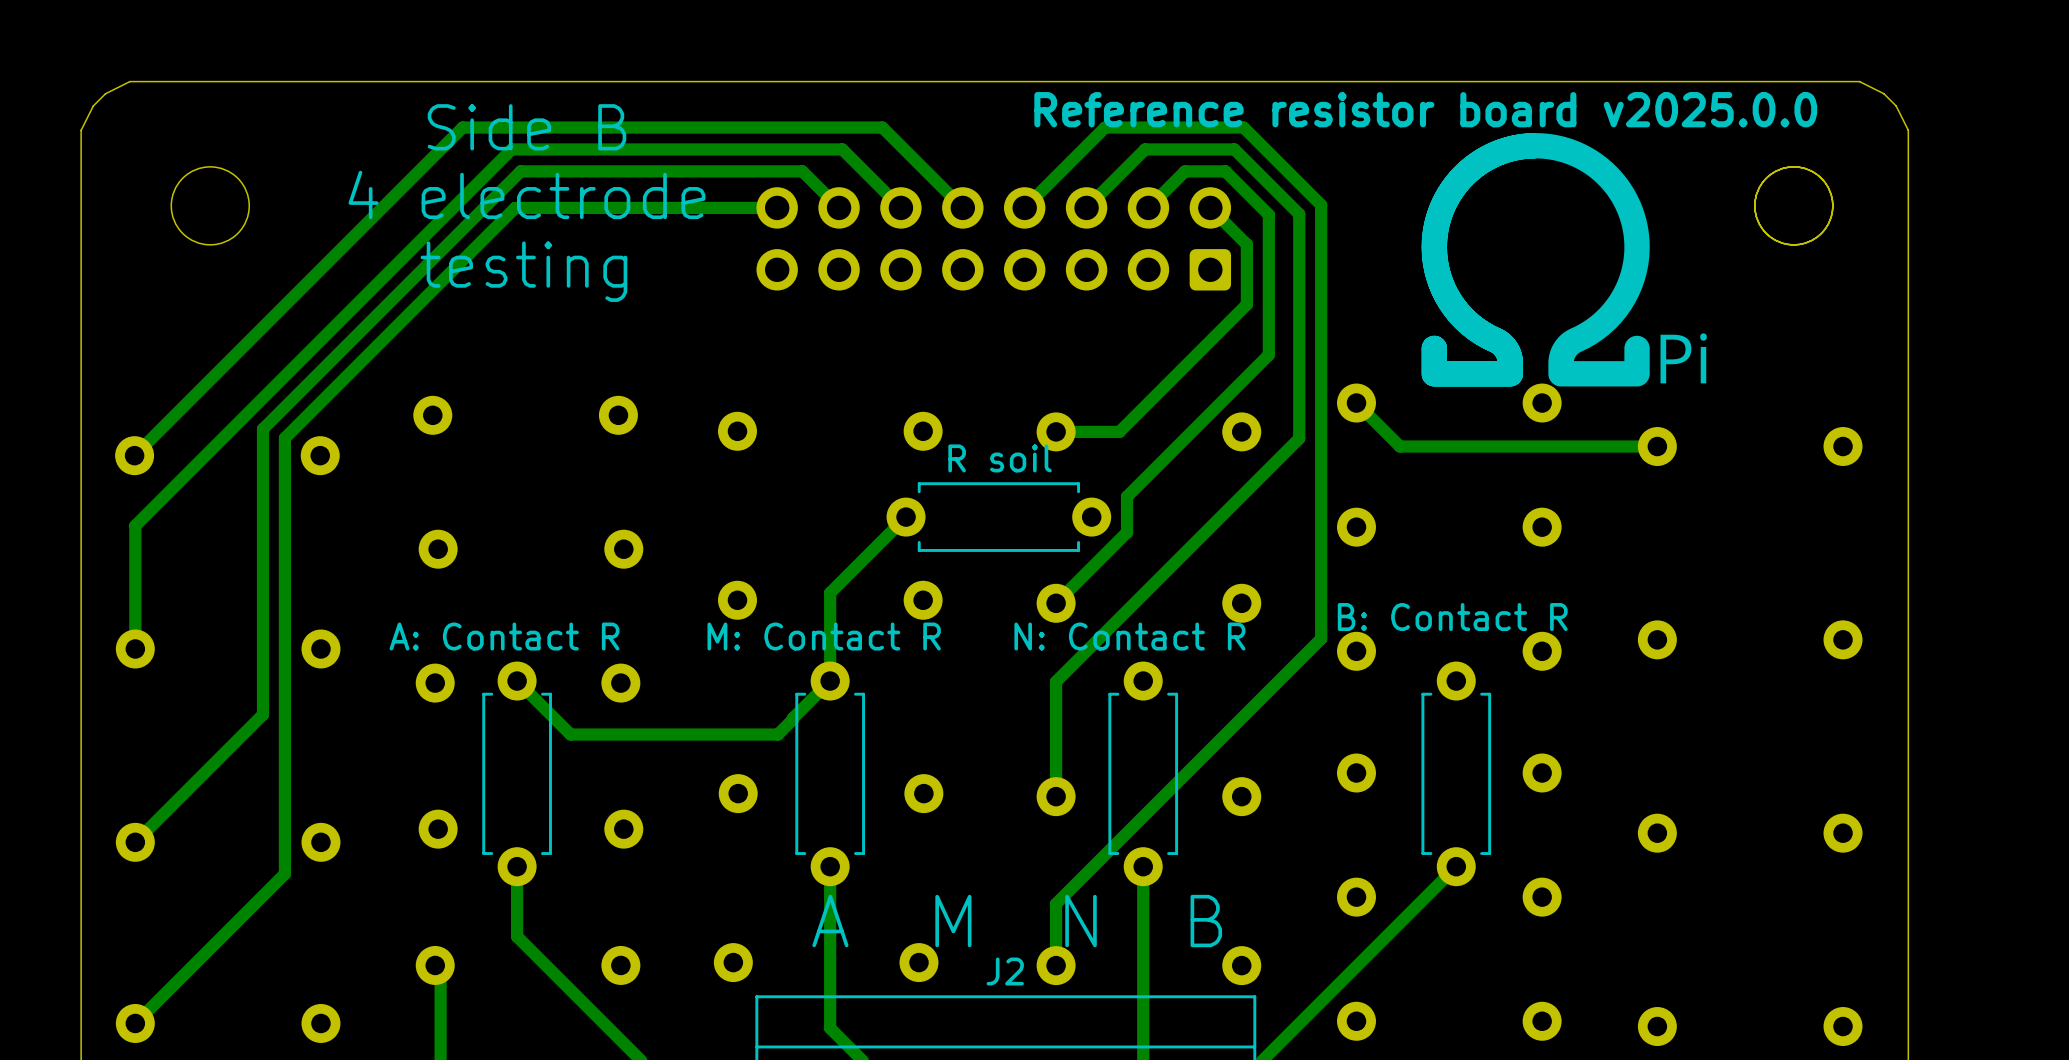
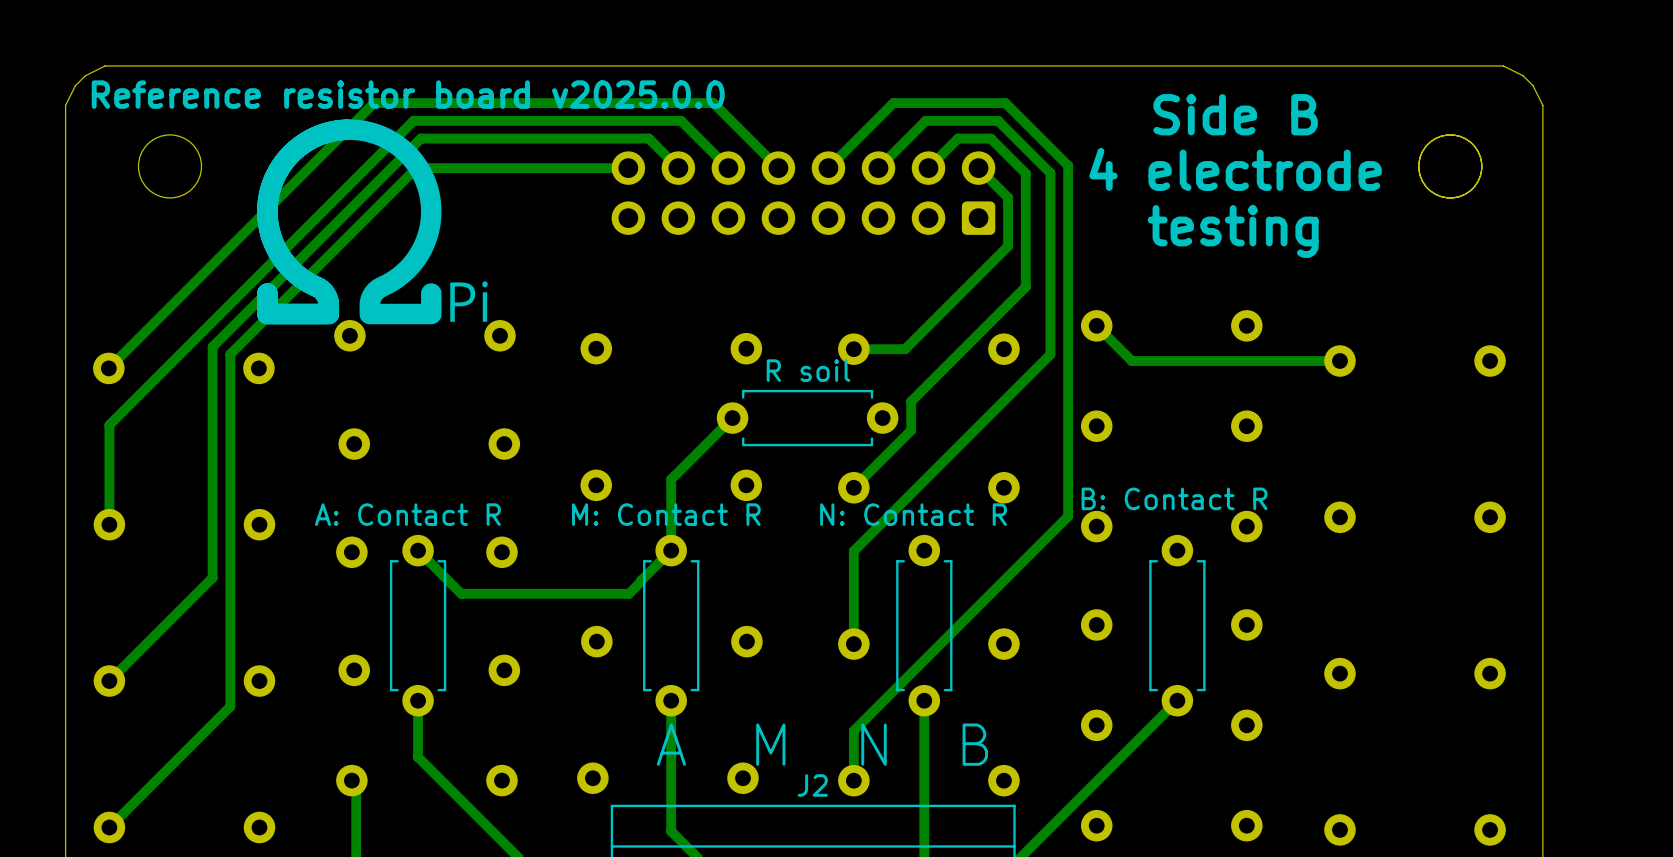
text: Reference resistor board v2025.0.0 (1425, 109) -> none
text: none -> Reference resistor board v2025.0.0 (408, 94)
text: Side B (526, 127) -> none
drawing: [1421, 133, 1707, 387] -> none
text: none -> Side B (1235, 114)
drawing: none -> [257, 119, 488, 325]
text: 4 electrode (526, 194) -> none
text: none -> 4 electrode (1235, 169)
text: testing (523, 271) -> none
text: none -> testing (1233, 231)

